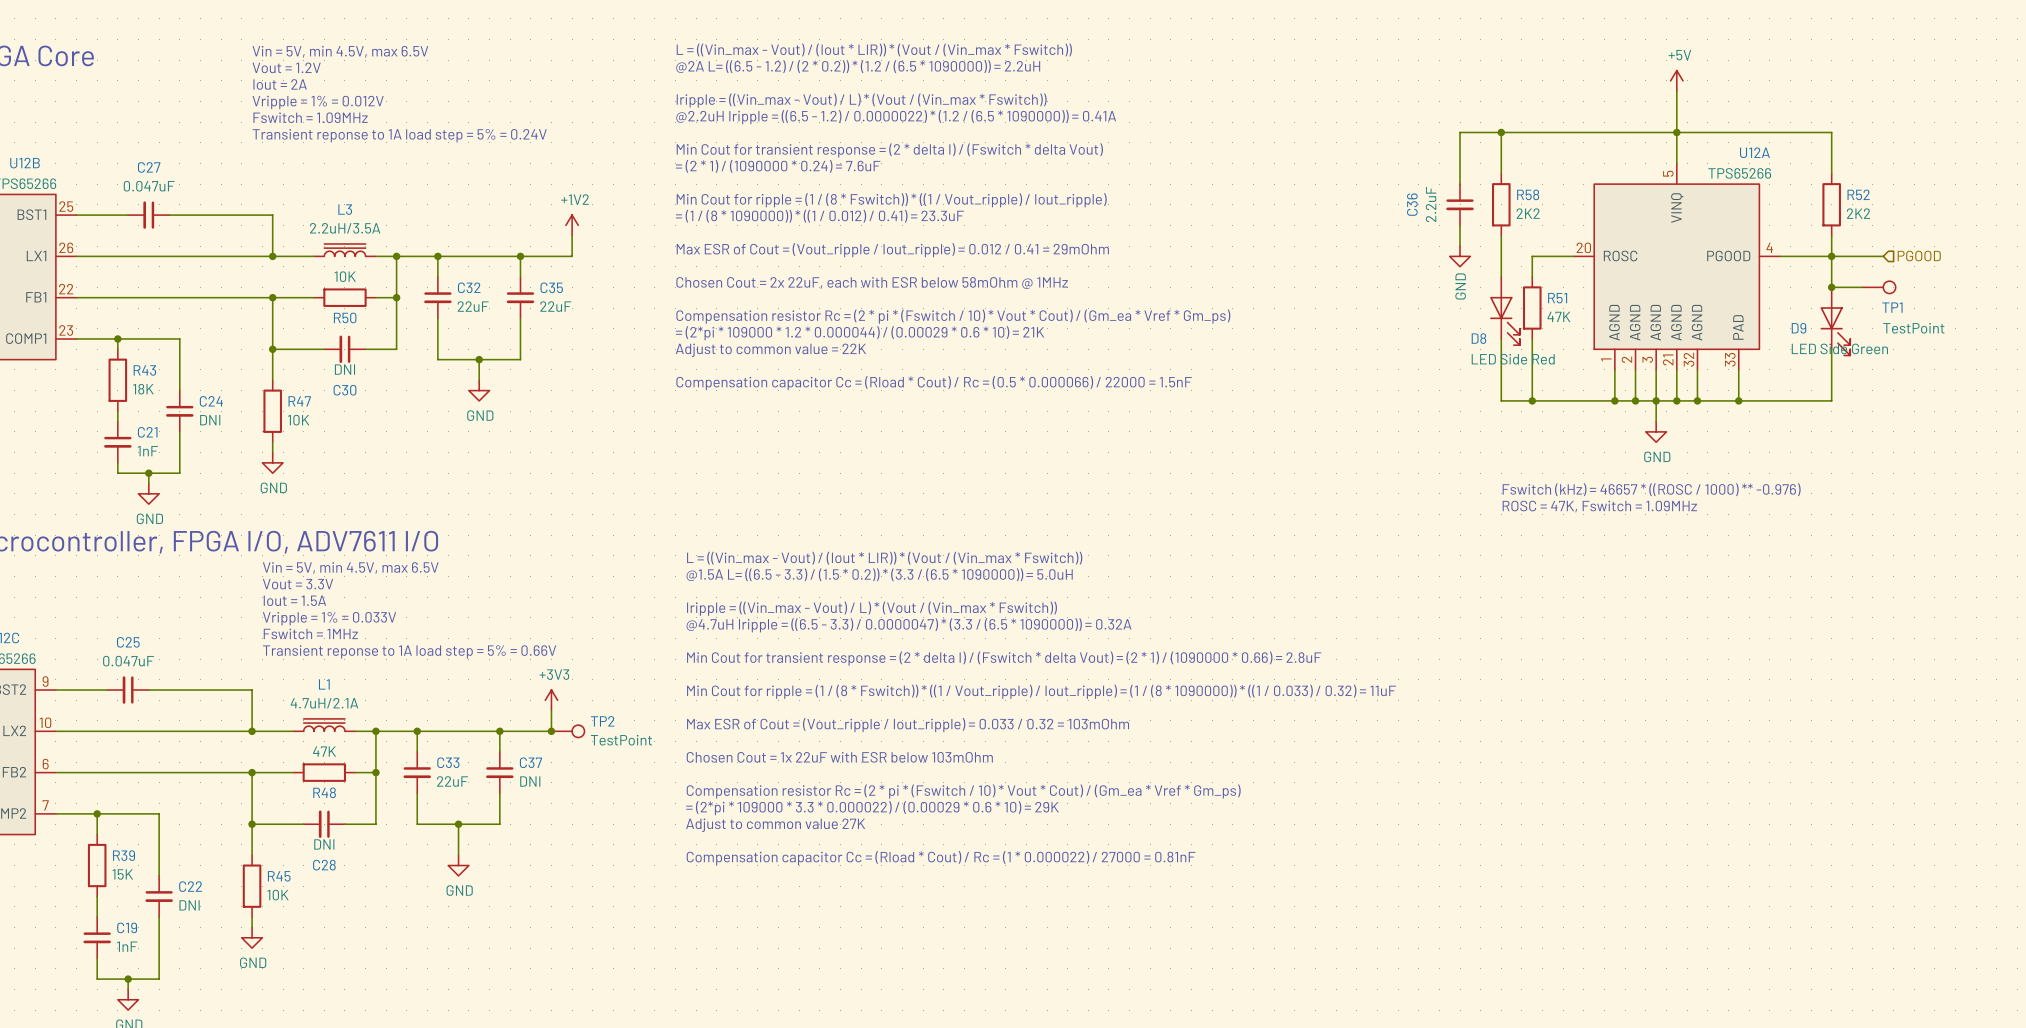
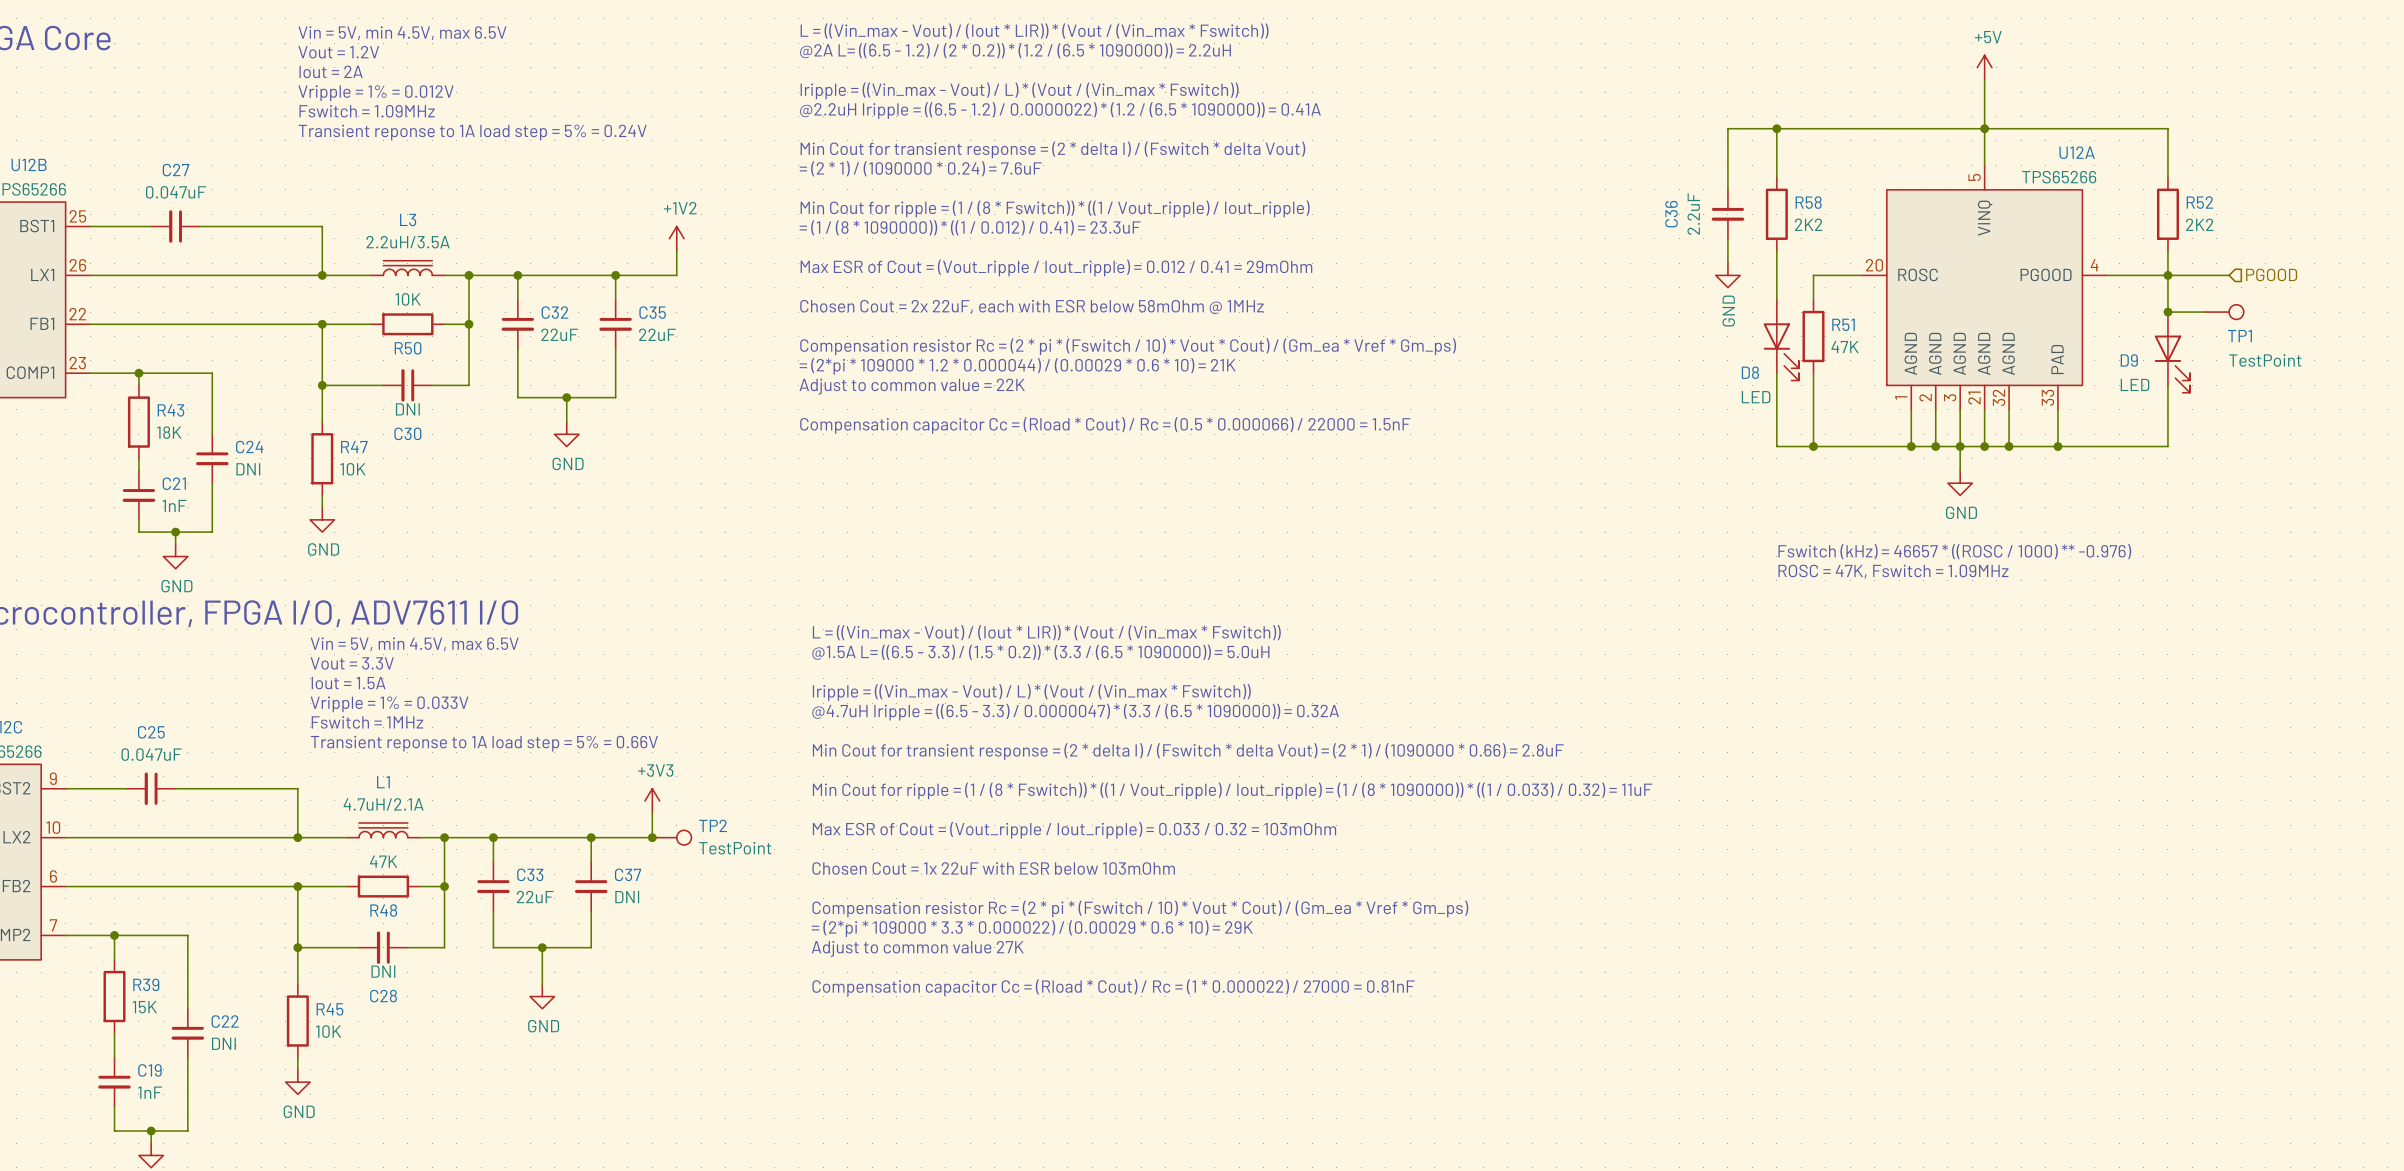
D9 value: LED Side Green (1839, 348) -> LED (2134, 384)
D8 value: LED Side Red (1513, 359) -> LED (1756, 397)

